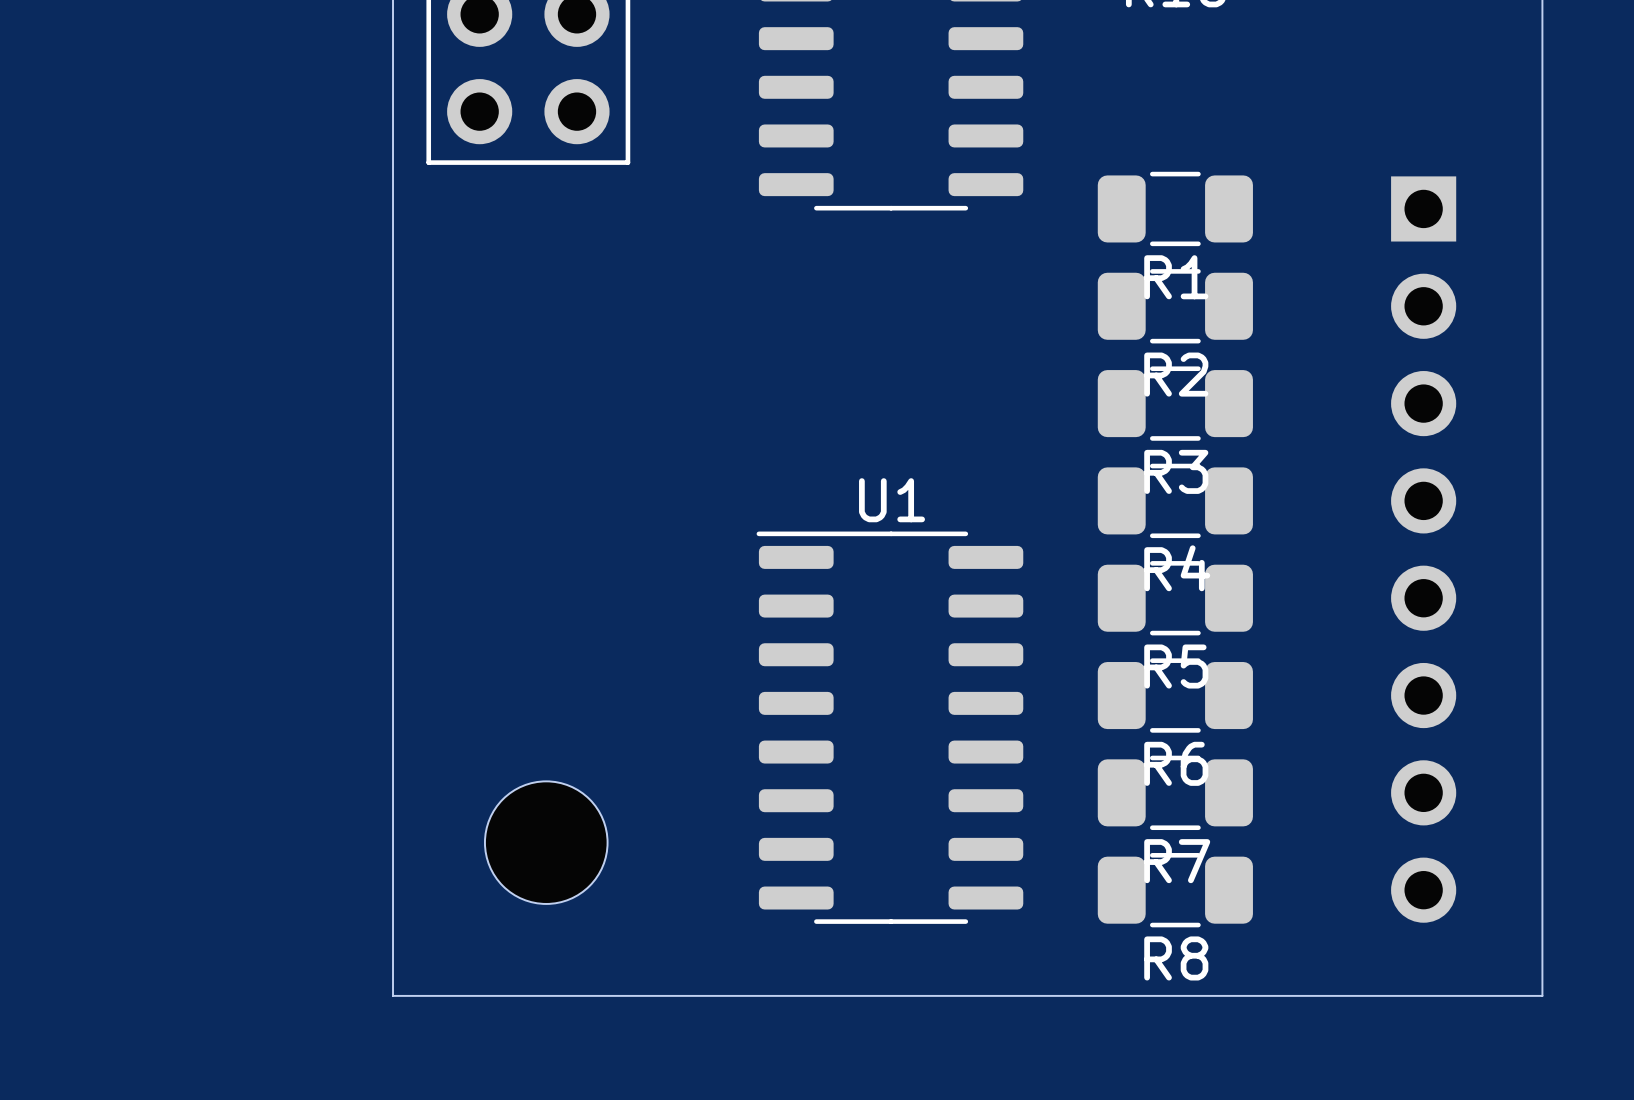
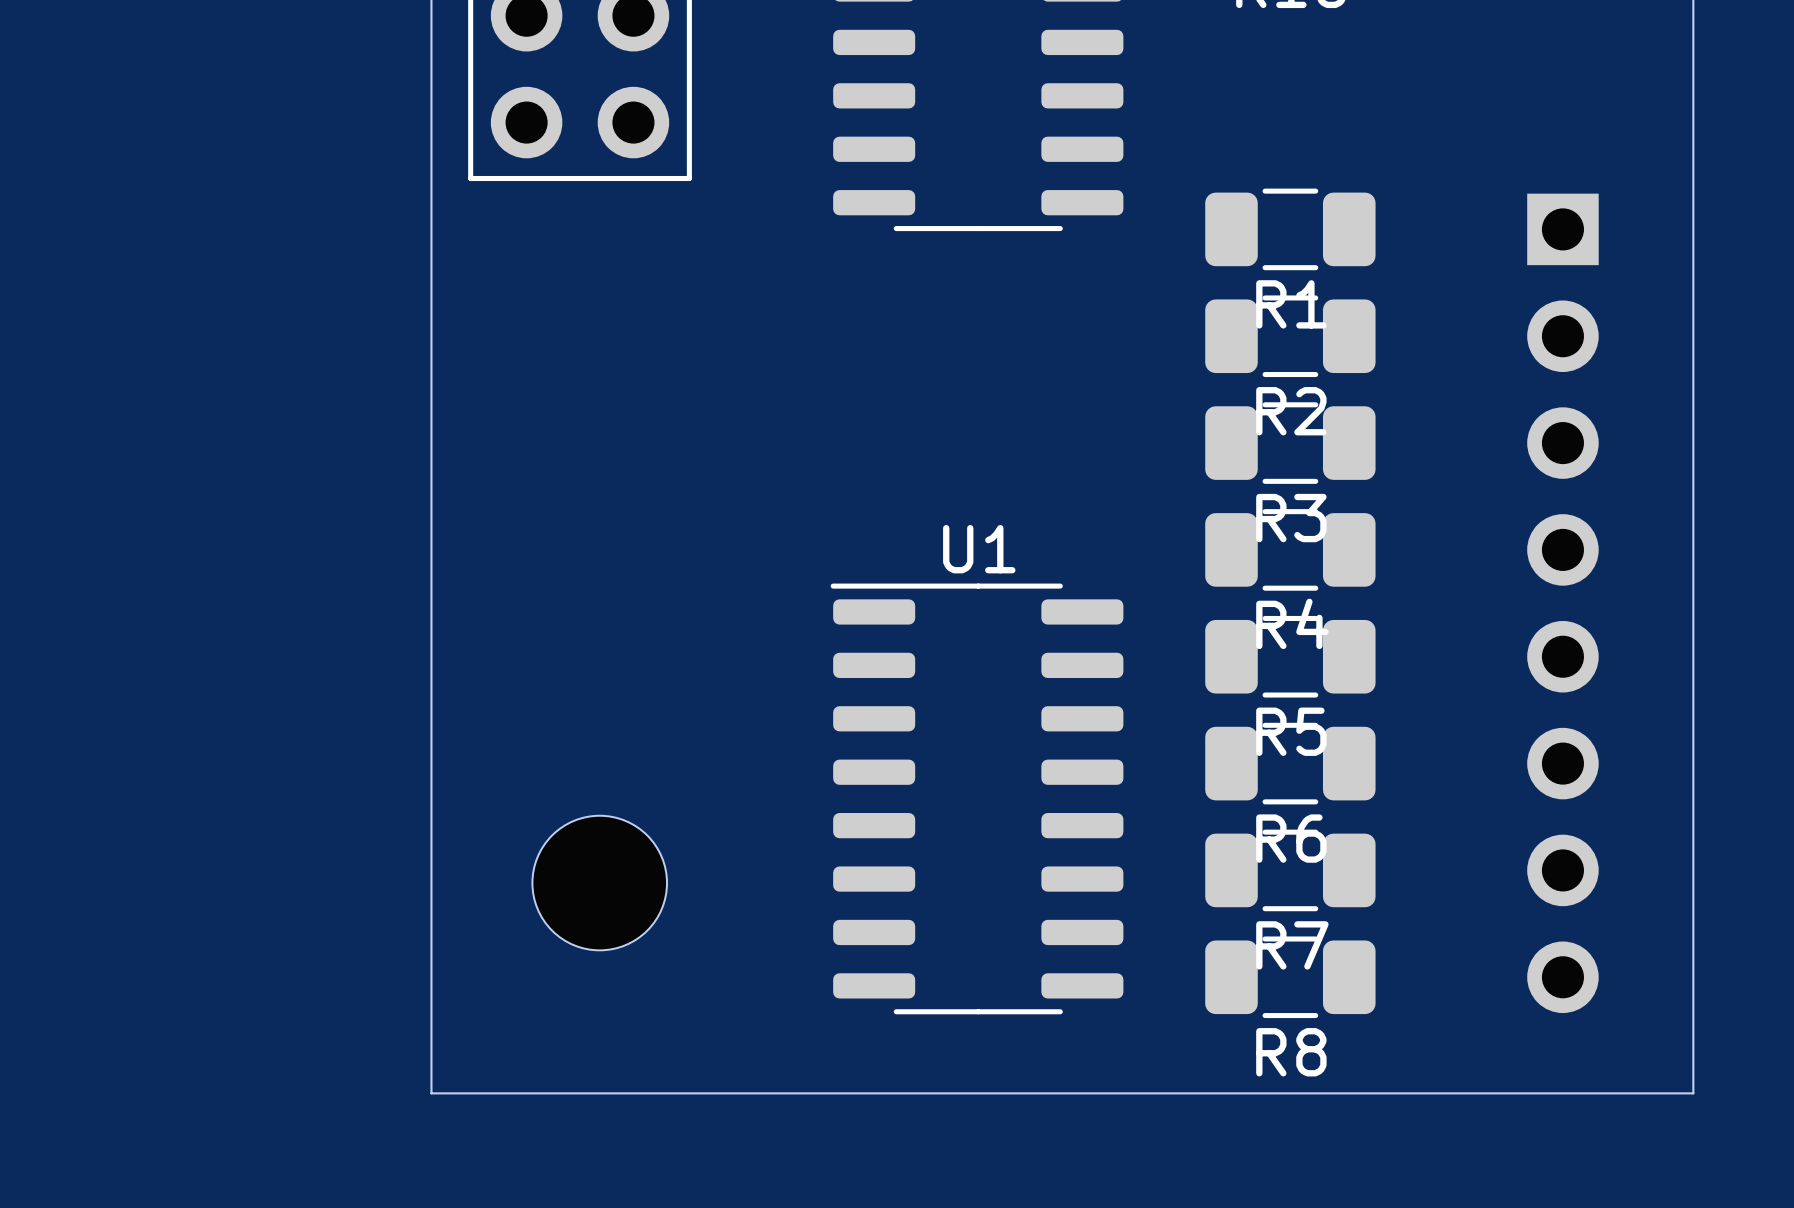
part position: (546, 842) -> (599, 883)

